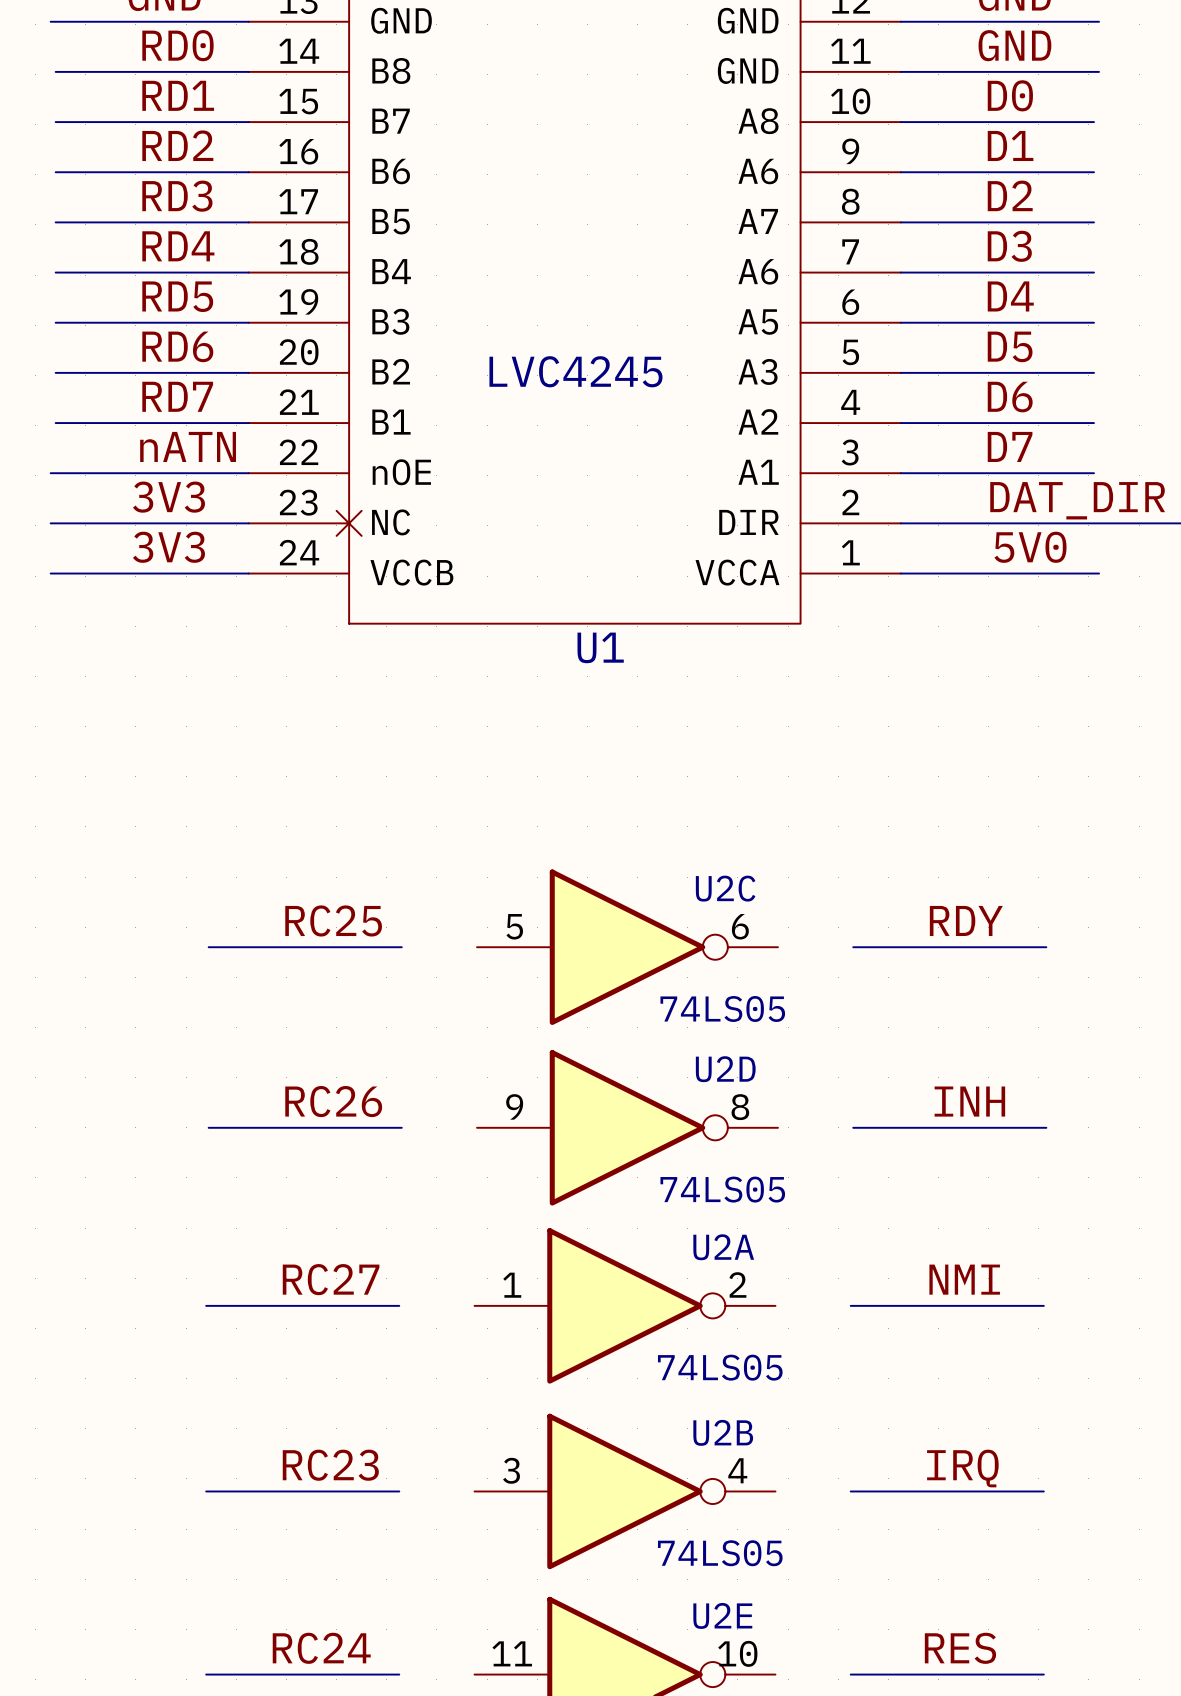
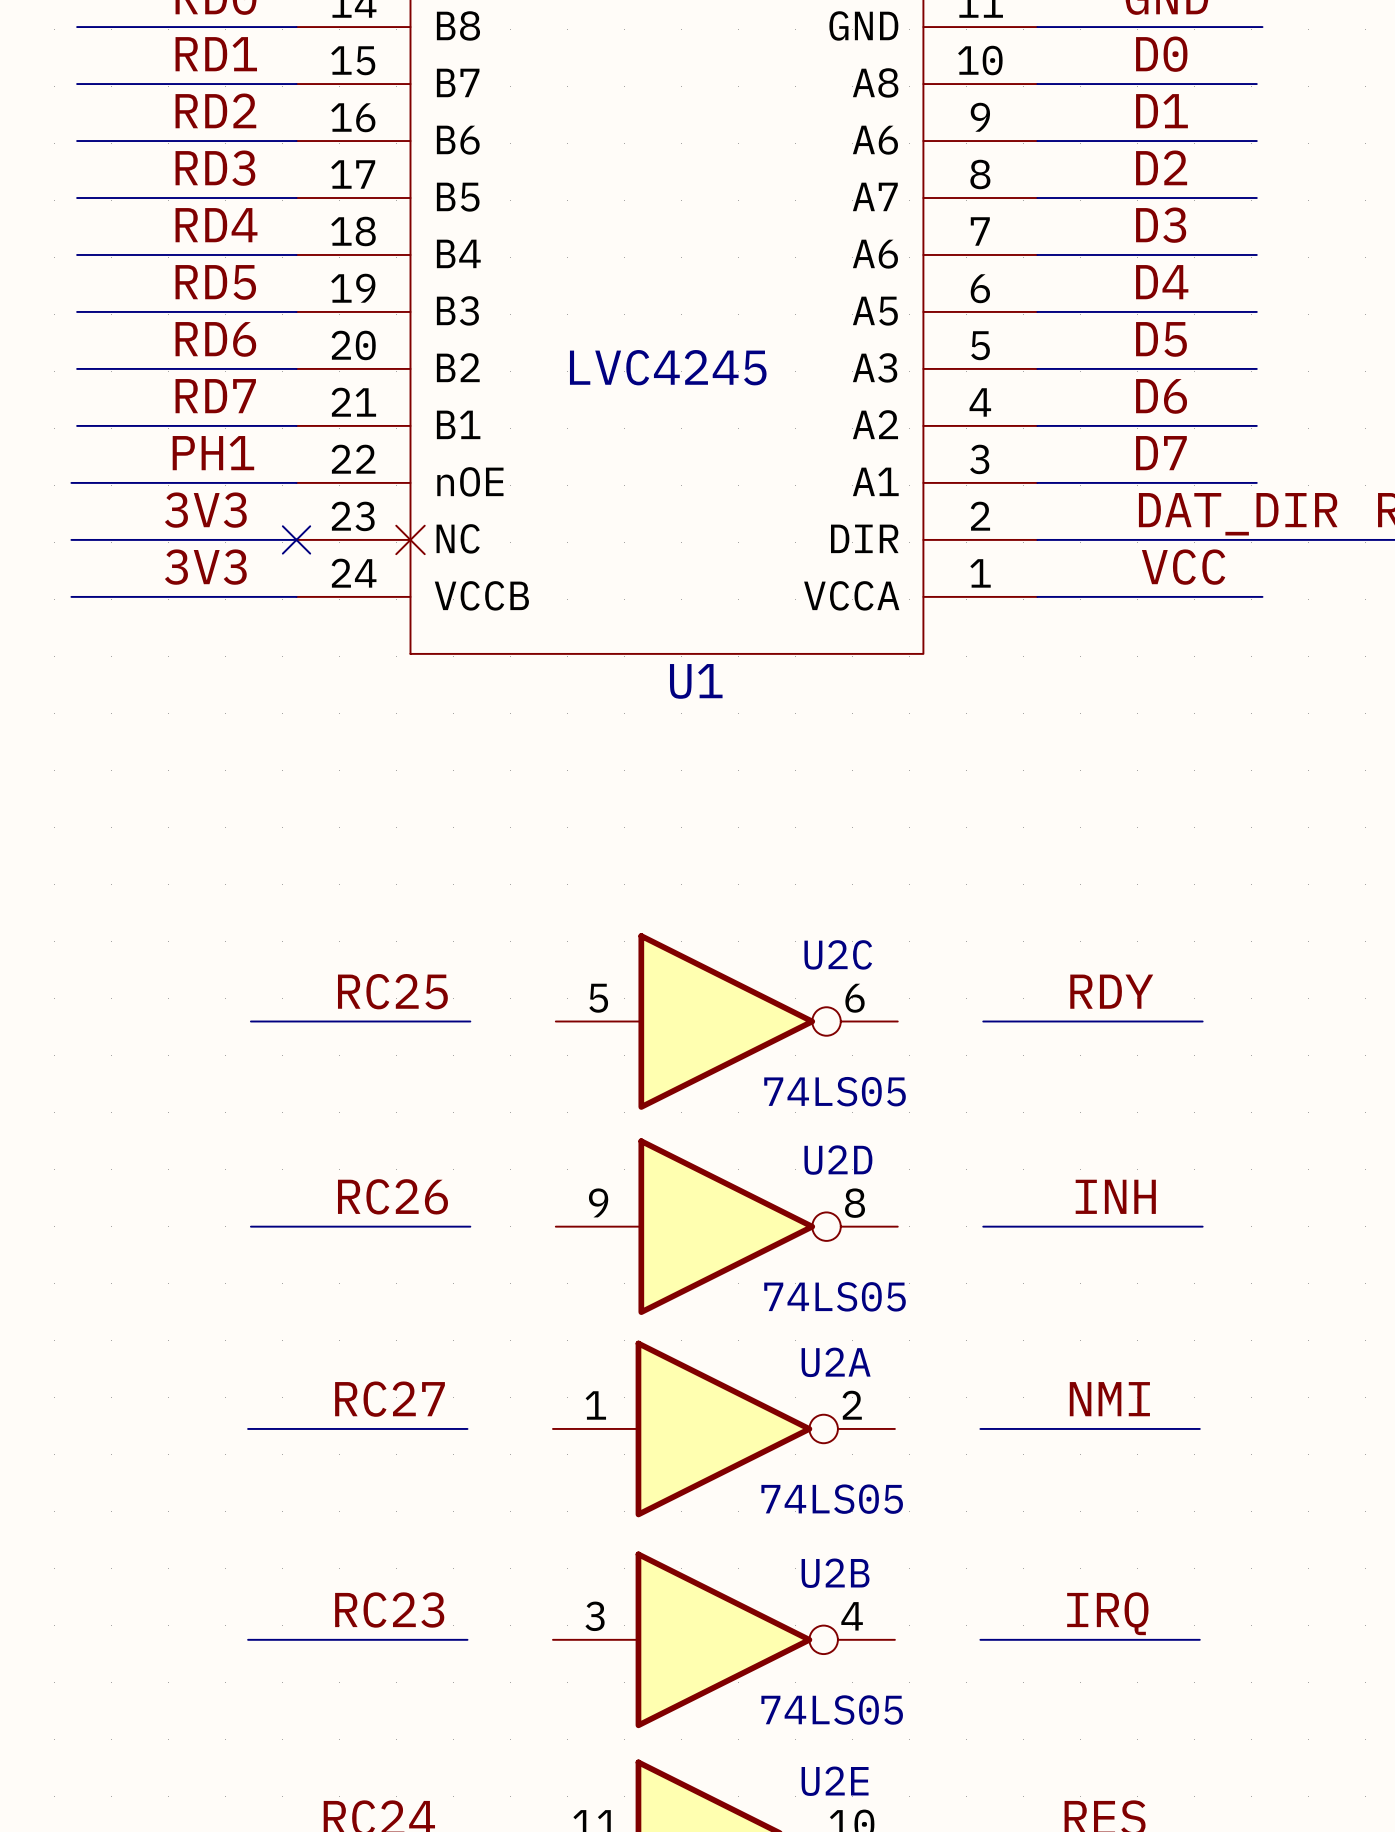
label: nATN (188, 446) -> PH1 (213, 453)
no-connect mark: none -> (296, 539)
label: 5V0 (1030, 547) -> VCC (1183, 567)

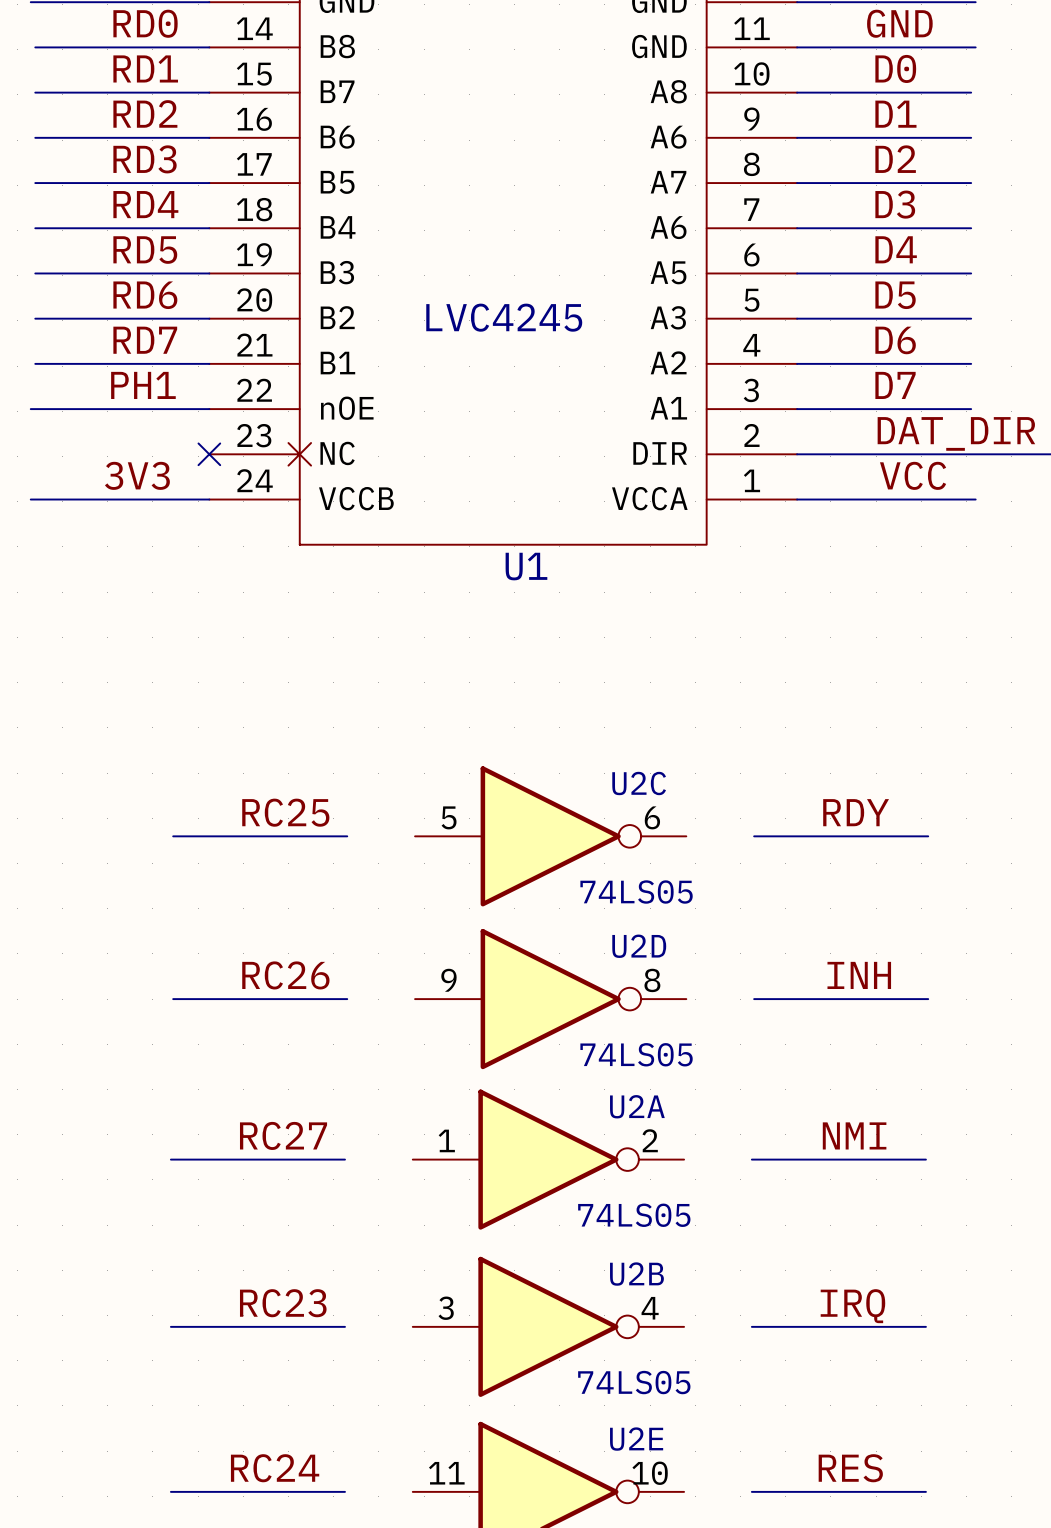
label: 3V3 (205, 510) -> none
wire: (71, 539) (296, 539) -> none

